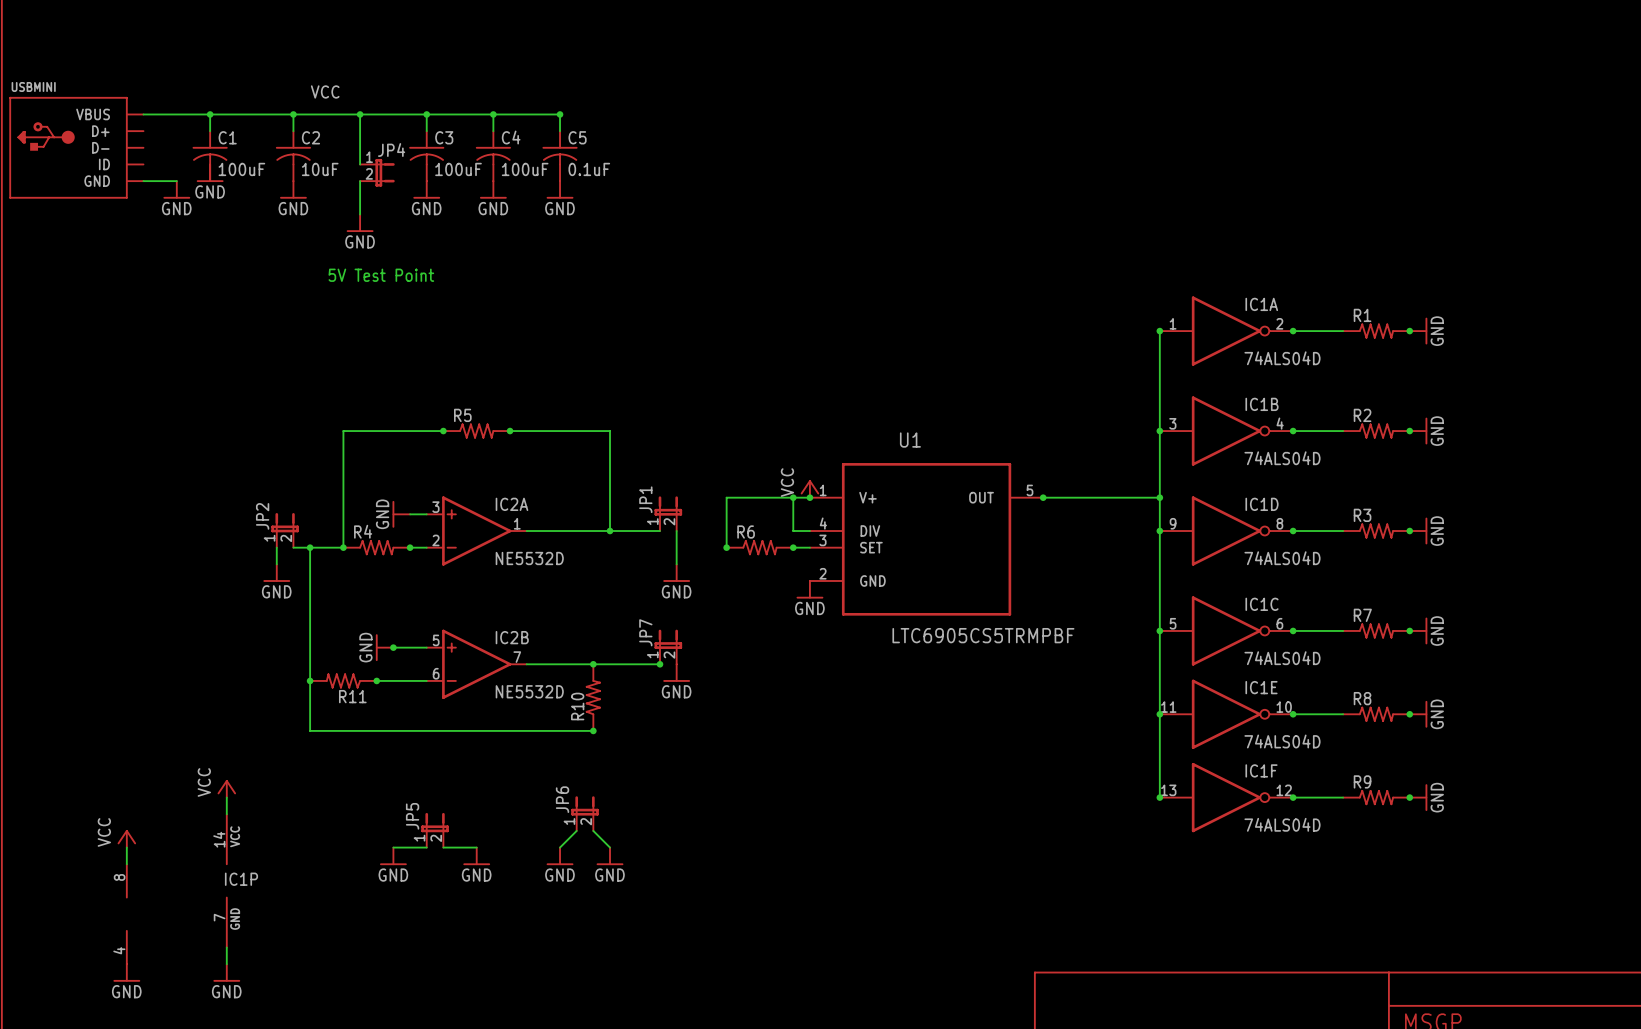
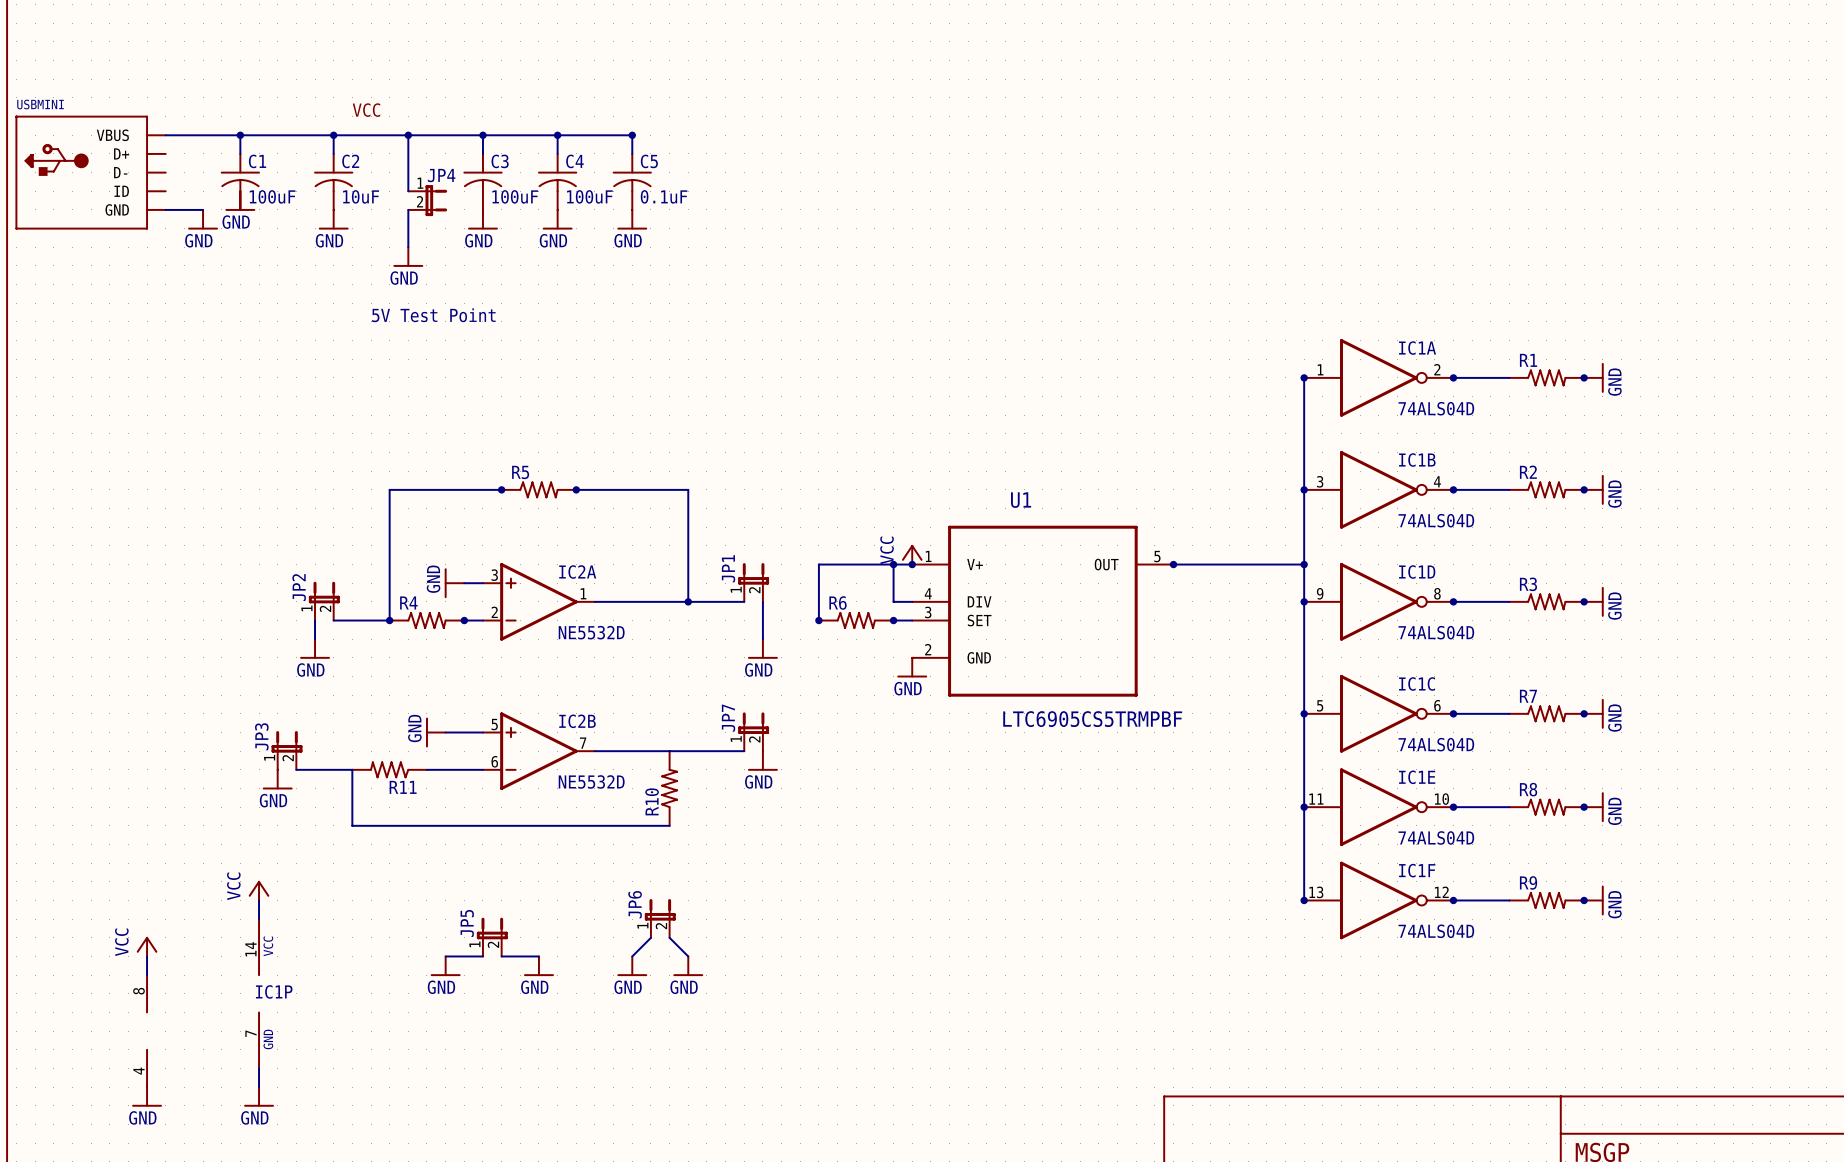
wire: (310, 547) (310, 680) -> (296, 769) (352, 769)
junction: (310, 547) -> none
junction: (393, 647) -> none
JP3: none -> (287, 750)
junction: (593, 664) -> none
junction: (659, 664) -> none
junction: (310, 680) -> none
junction: (376, 680) -> none
power symbol: none -> GND (277, 779)
junction: (593, 730) -> none

